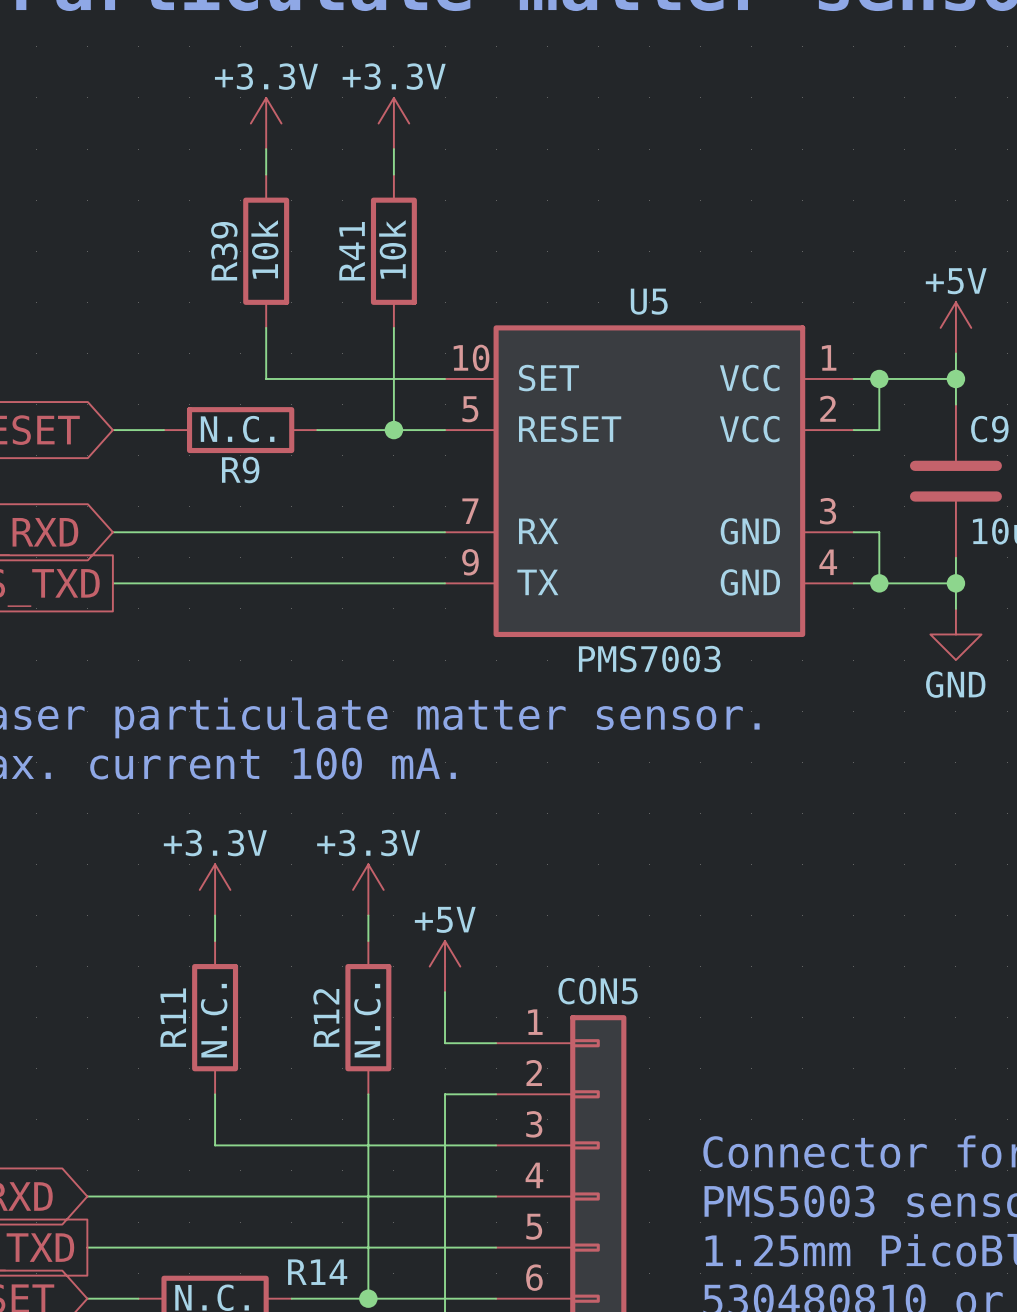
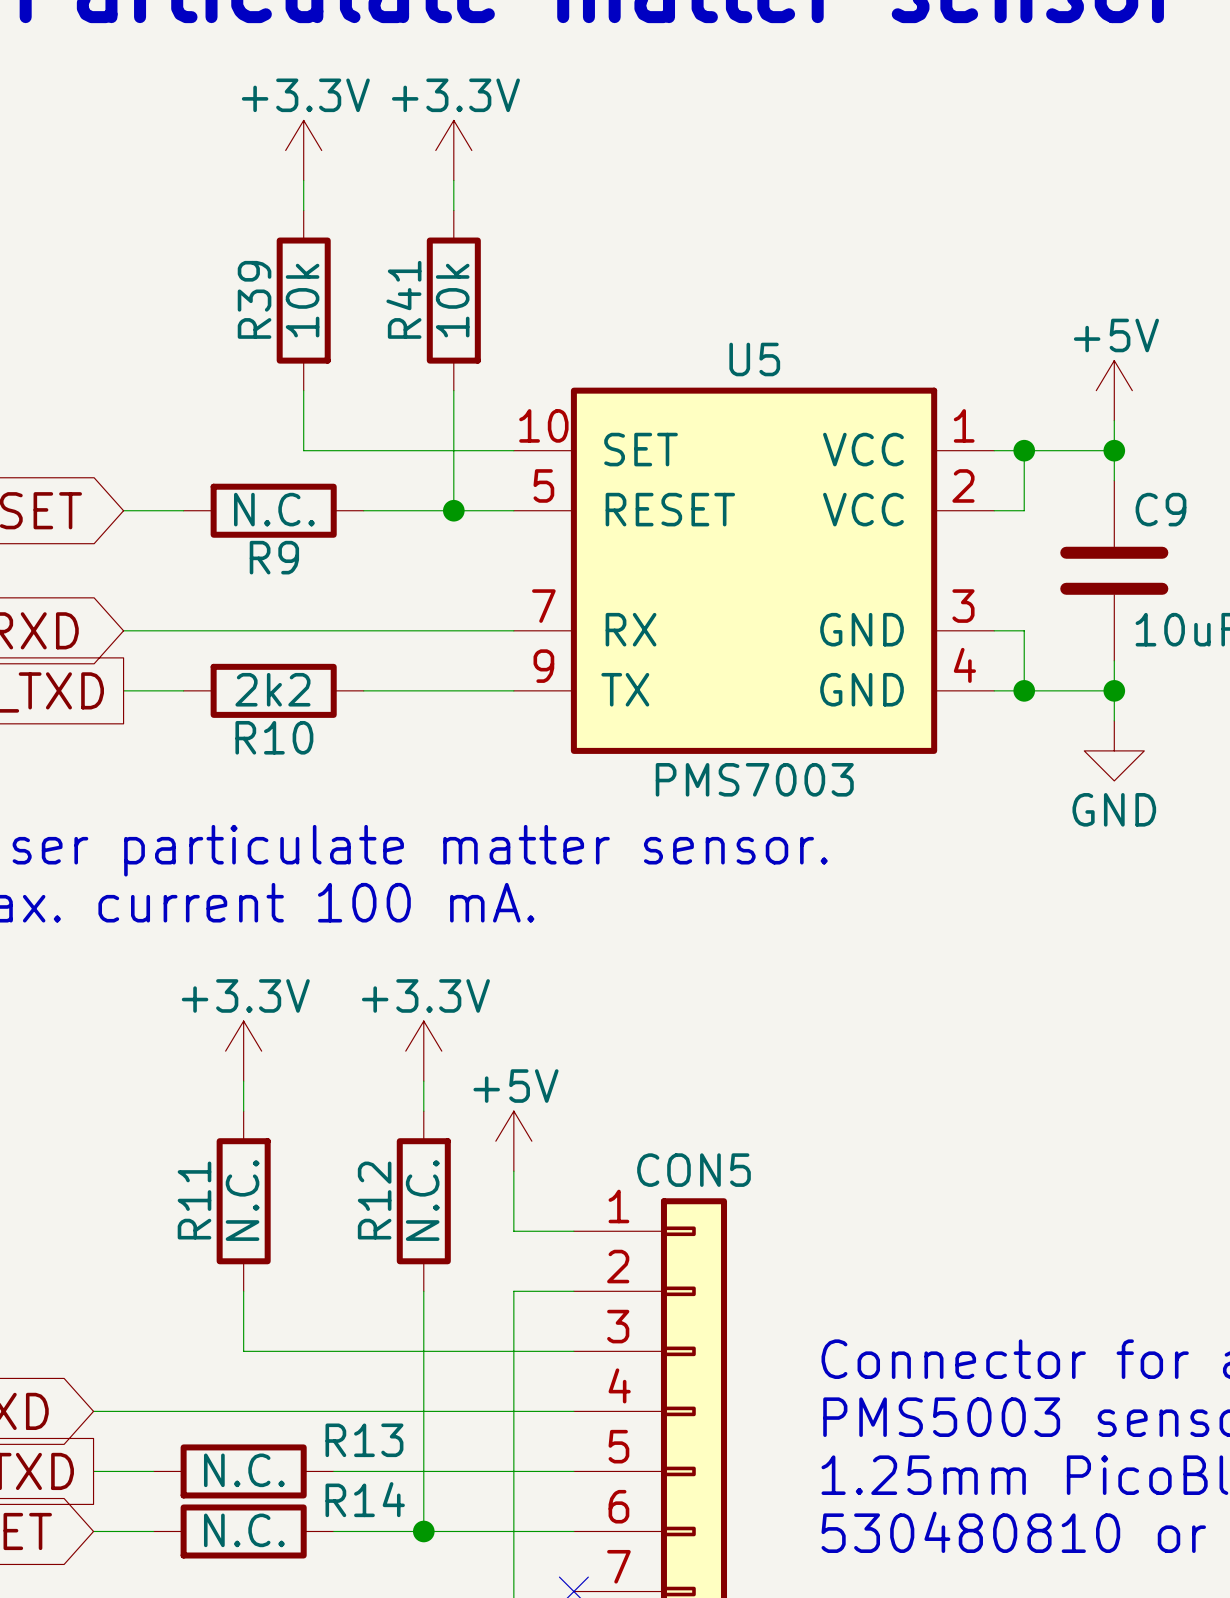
wire: (163, 583) (317, 583) -> none
R10: none -> 2k2 (273, 690)
wire: (138, 1247) (291, 1247) -> none
R13: none -> N.C. (243, 1471)

